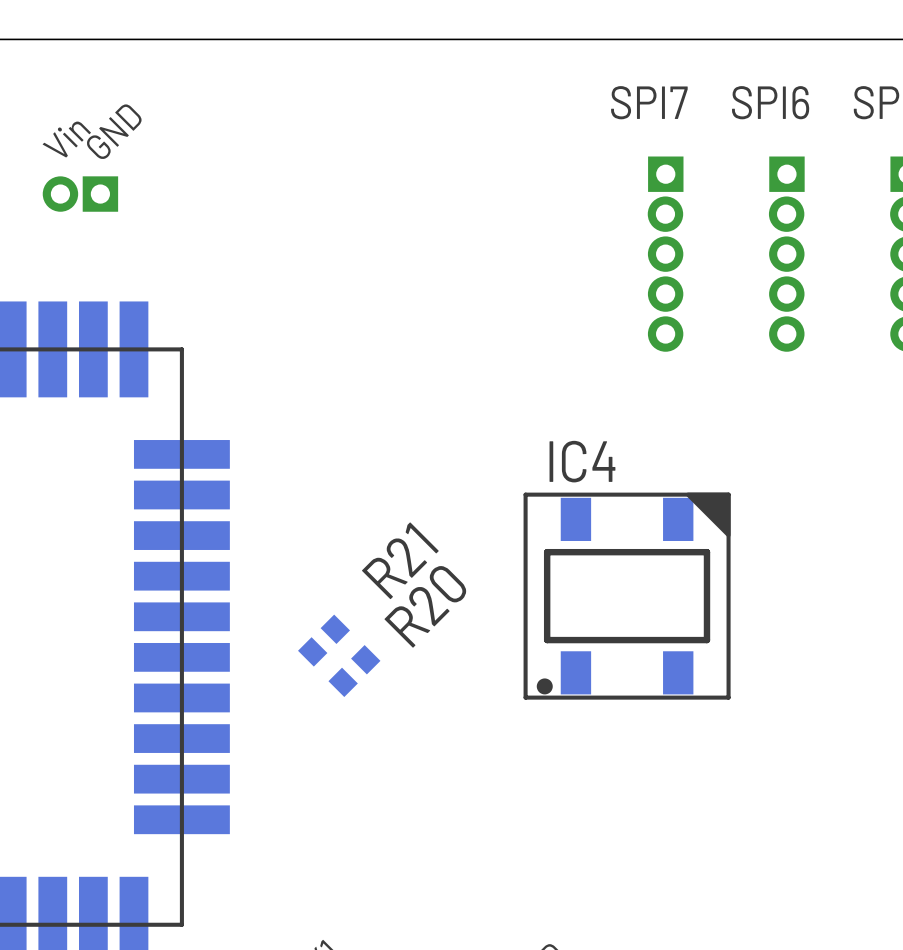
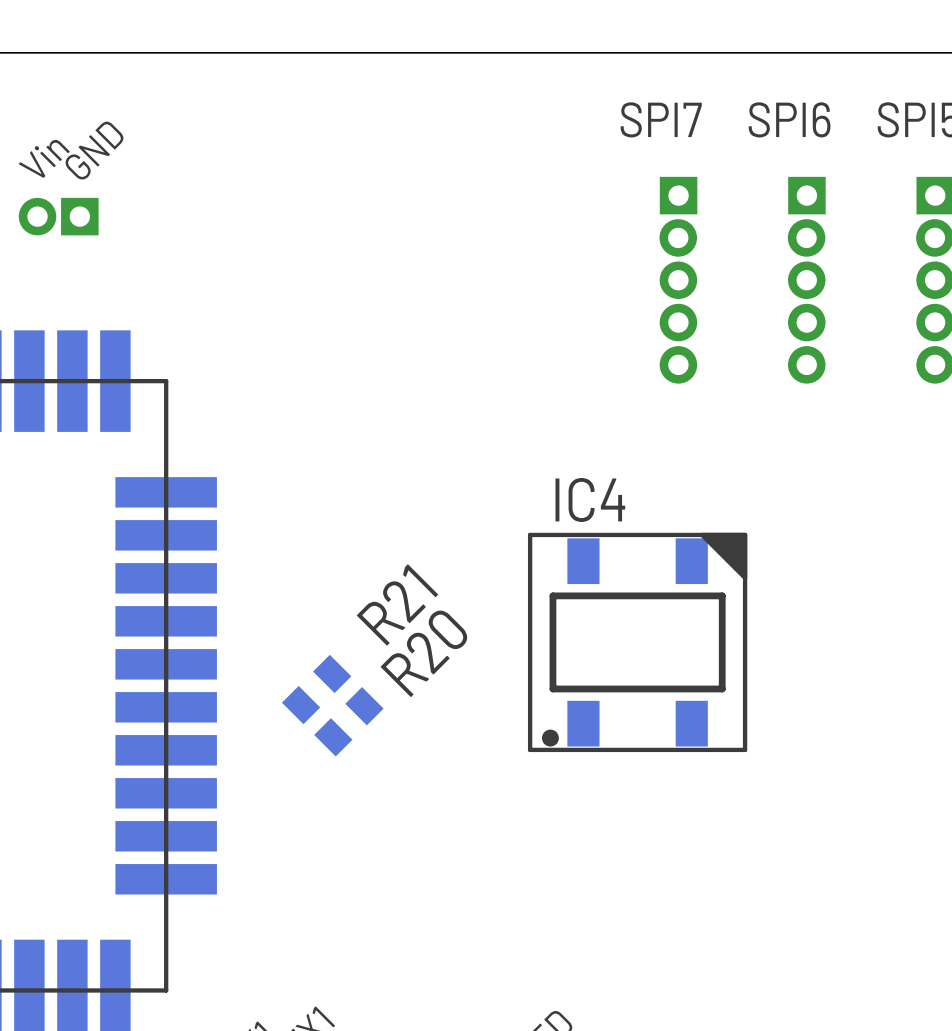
R21 footprint: [298, 614, 351, 667] -> [281, 654, 352, 725]
R20 footprint: [328, 645, 381, 698] -> [314, 687, 384, 757]

